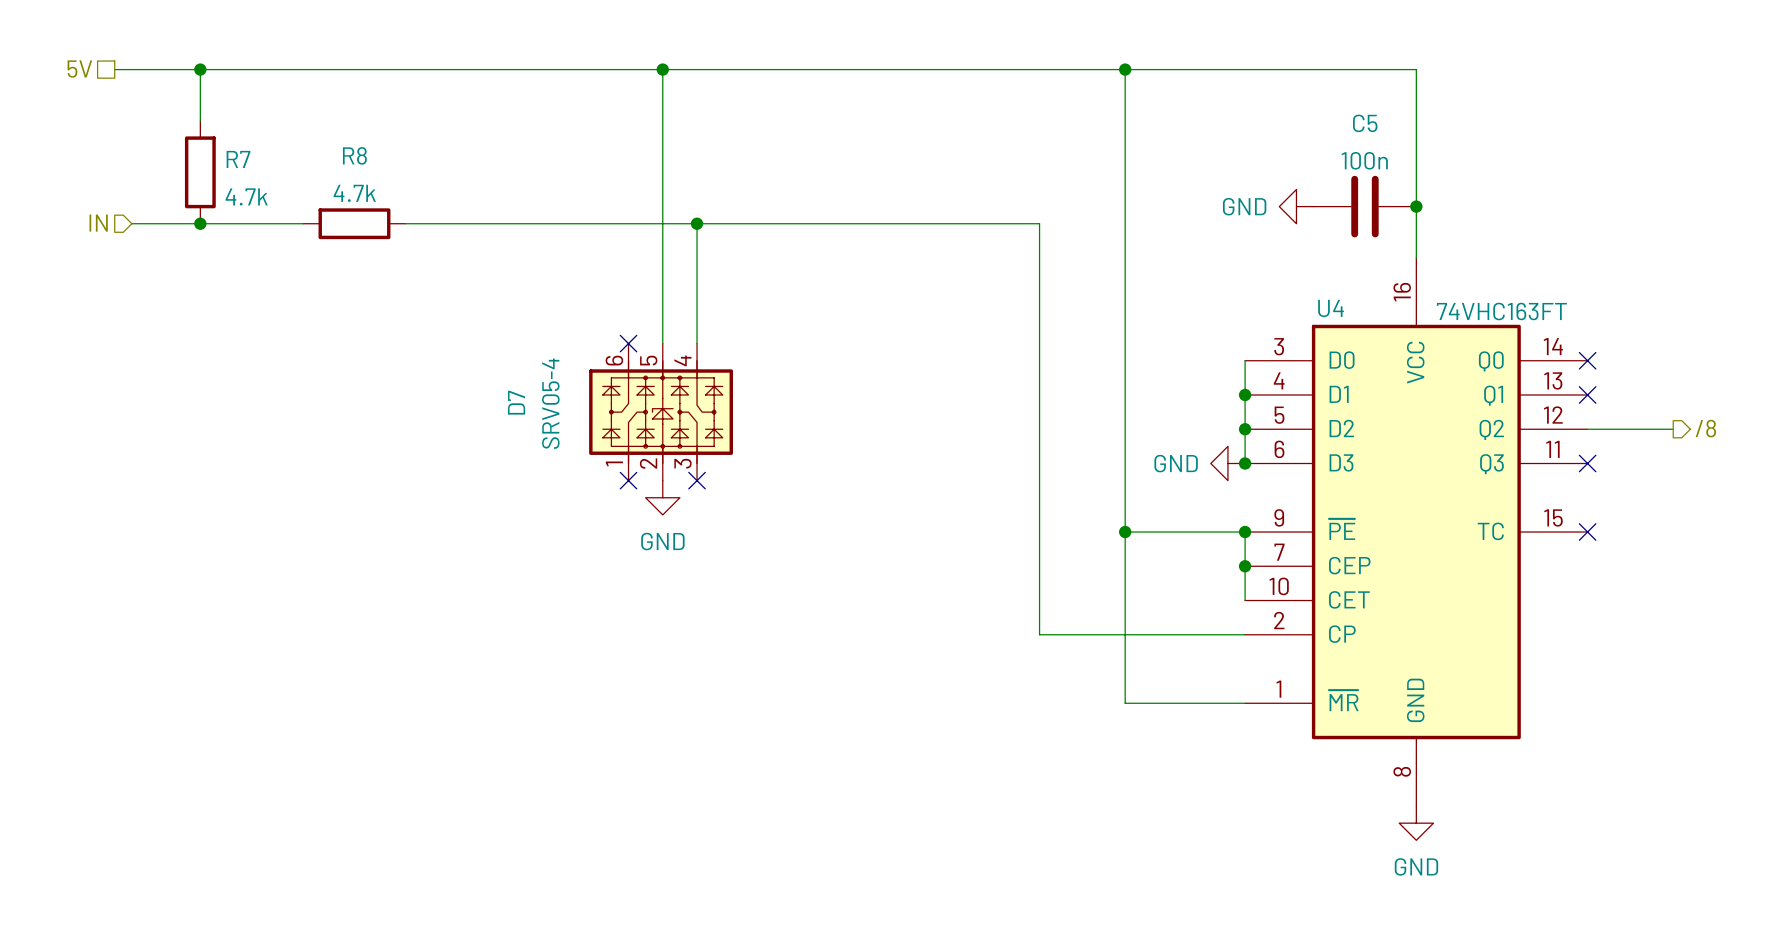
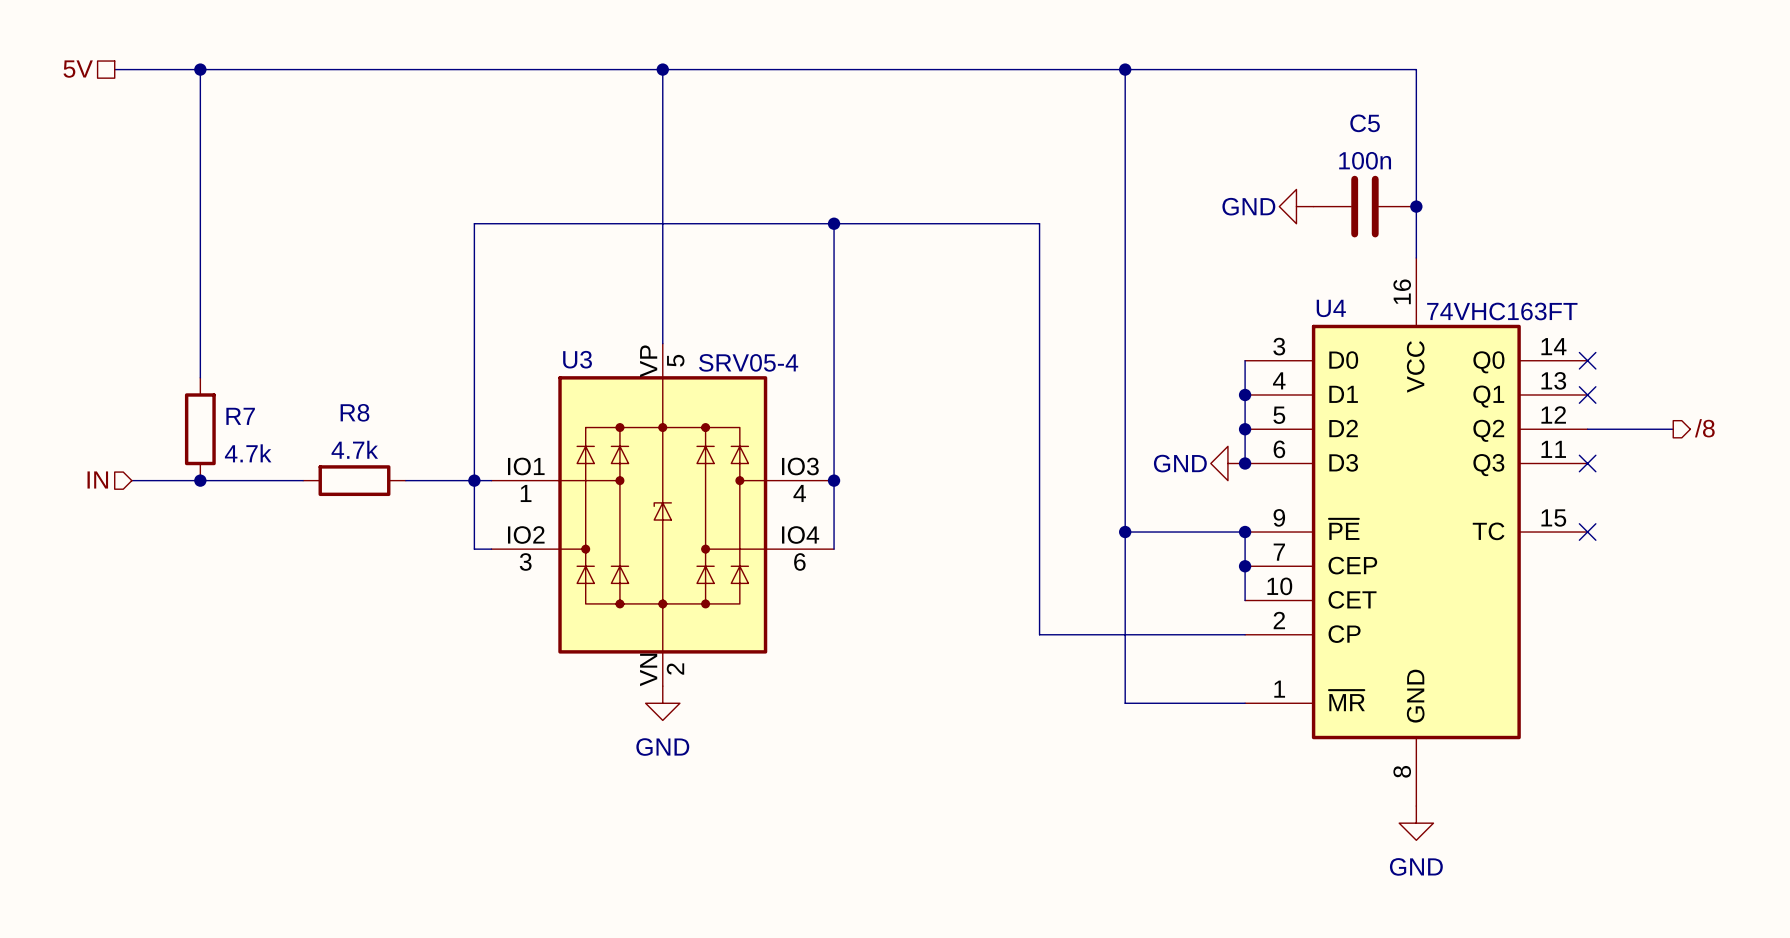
wire: none -> (200, 120) (200, 377)
R7 position: (200, 172) -> (200, 429)
hierarchical label position: IN (98, 223) -> IN (97, 479)
wire: (131, 223) (303, 223) -> (131, 480) (303, 480)
junction: (200, 223) -> none
R8 position: (354, 223) -> (354, 480)
wire: (405, 223) (474, 223) -> (491, 549) (474, 549) (474, 223)
wire: (697, 223) (697, 343) -> none
junction: (697, 223) -> none
wire: none -> (834, 223) (834, 549)
junction: none -> (834, 223)
no-connect mark: (628, 343) -> none
D7: SRV05-4 (661, 412) -> none
junction: none -> (200, 480)
wire: none -> (405, 480) (491, 480)
junction: none -> (474, 480)
no-connect mark: (628, 480) -> none
no-connect mark: (697, 480) -> none
junction: none -> (834, 480)
power symbol position: GND (662, 497) -> GND (662, 703)
U3: none -> SRV05-4 (662, 514)

